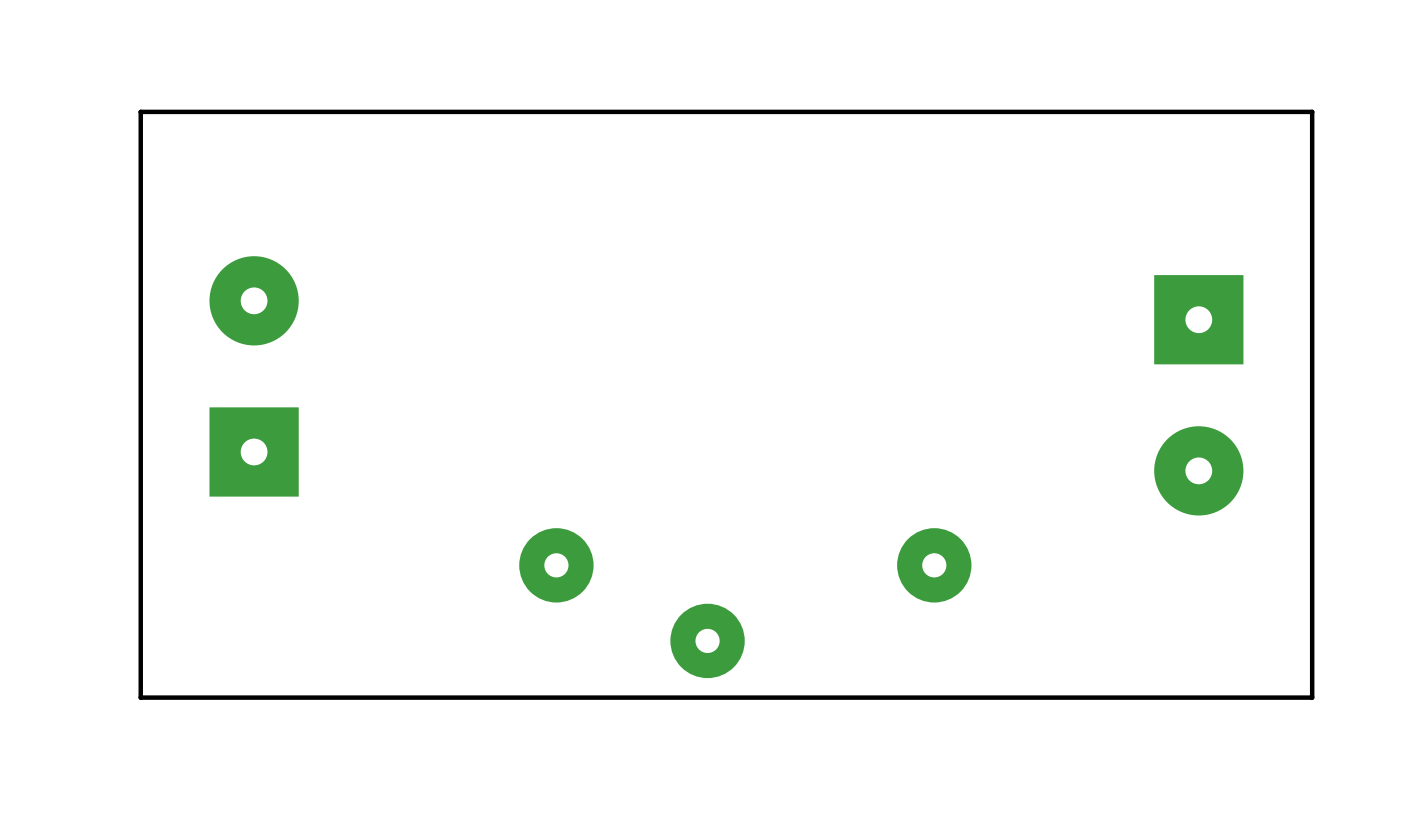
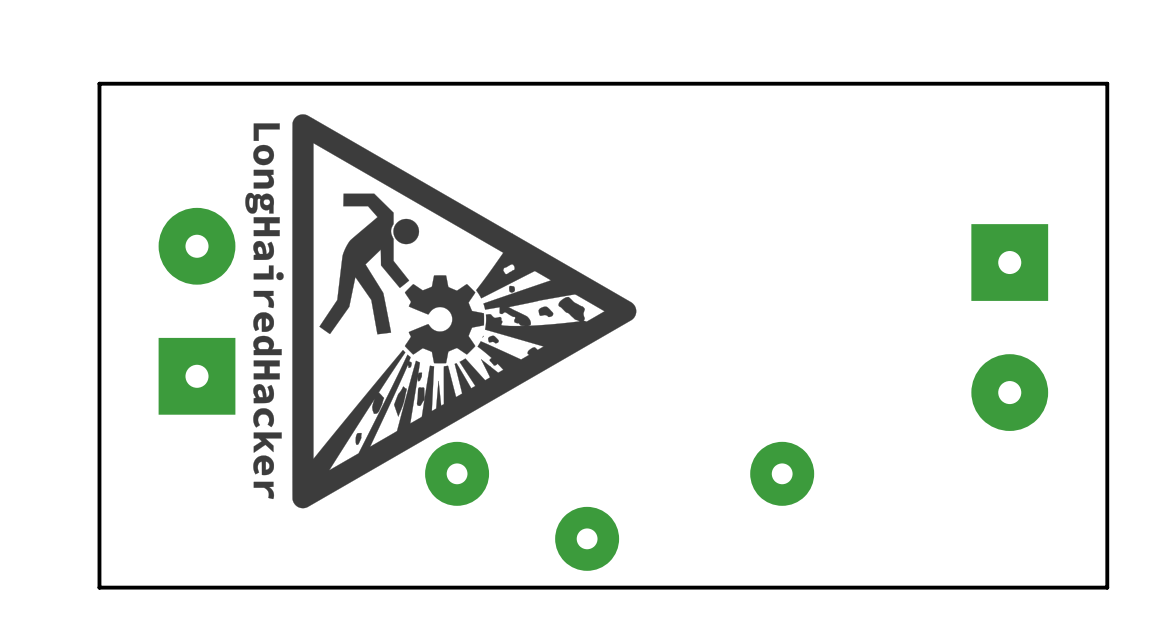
drawing: none -> [245, 114, 637, 509]

